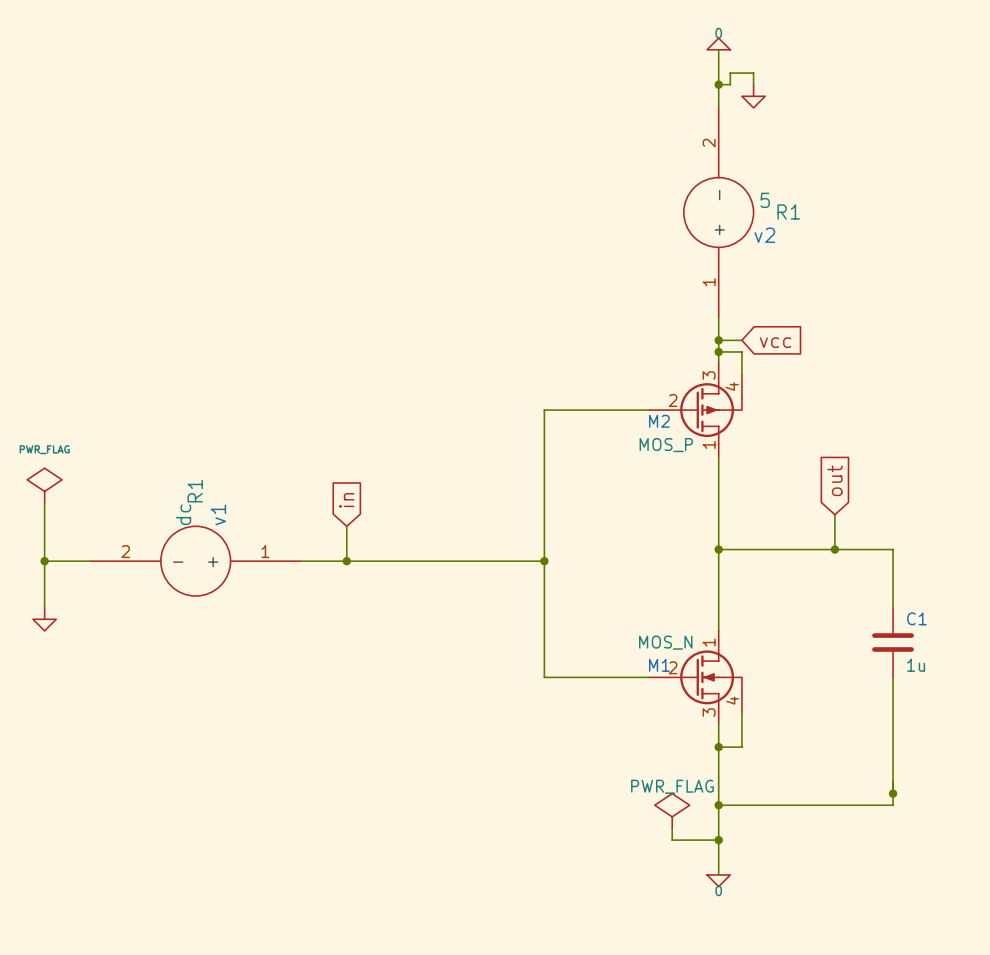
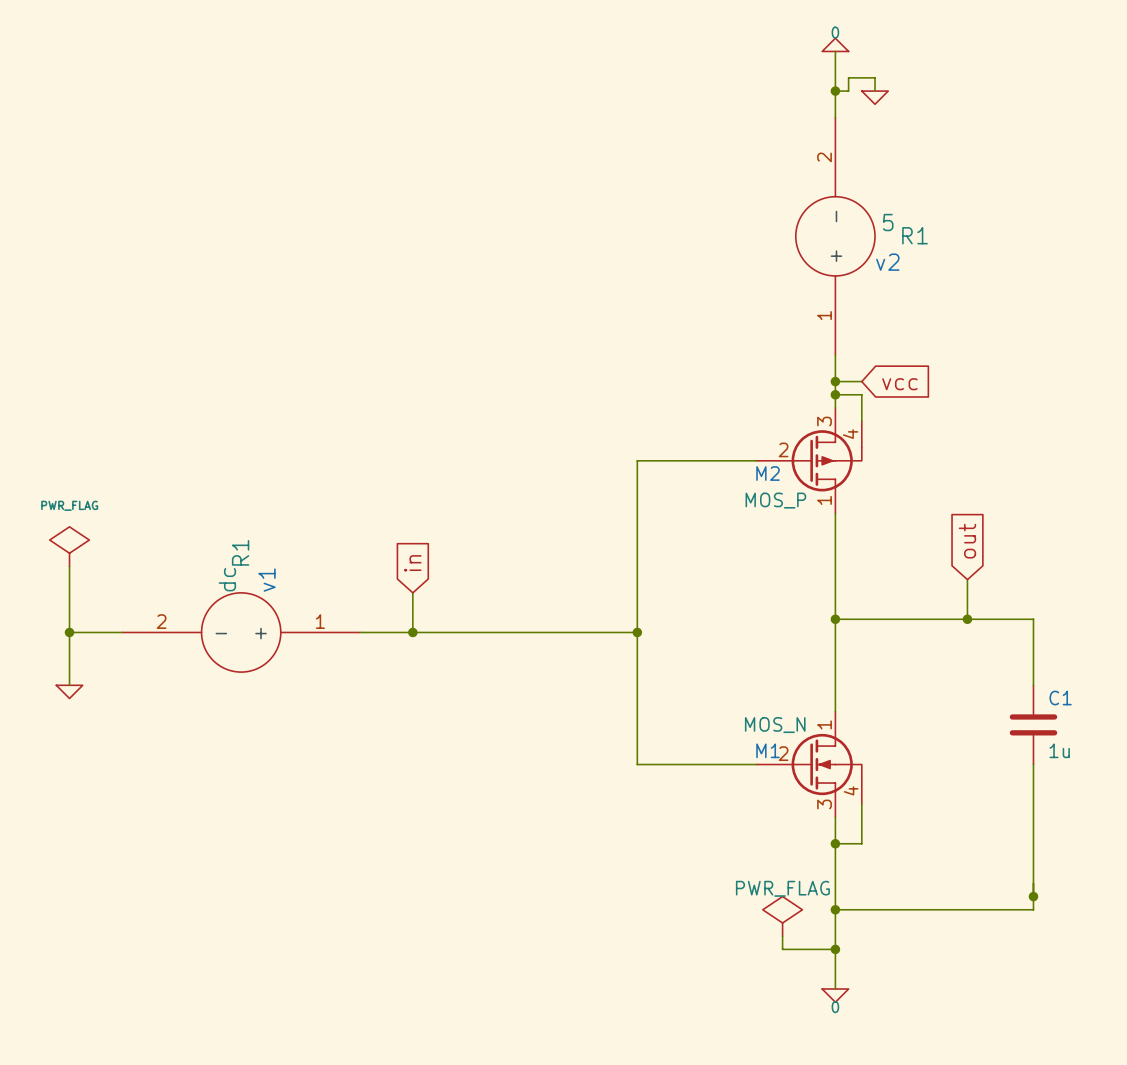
power symbol shape: [741, 84, 766, 108] -> [861, 91, 889, 105]
power symbol shape: [32, 607, 57, 631] -> [56, 685, 83, 699]

